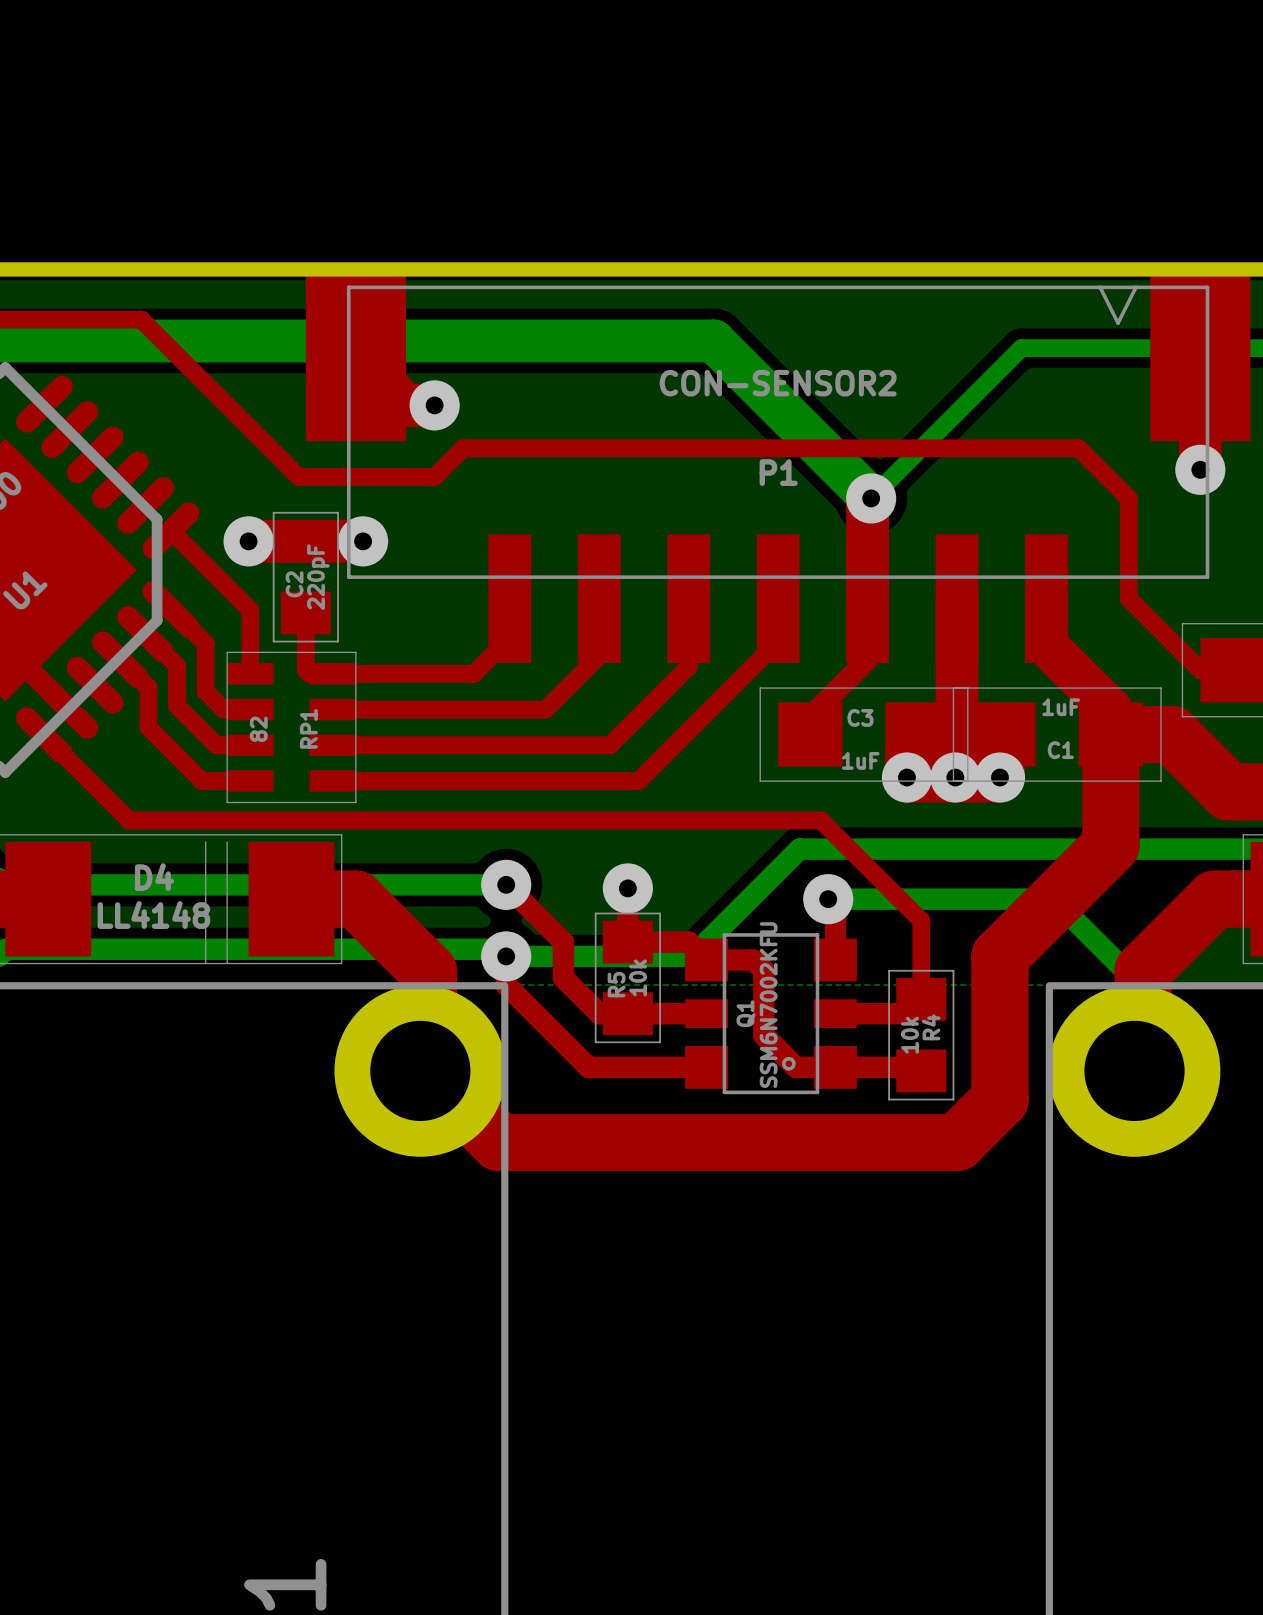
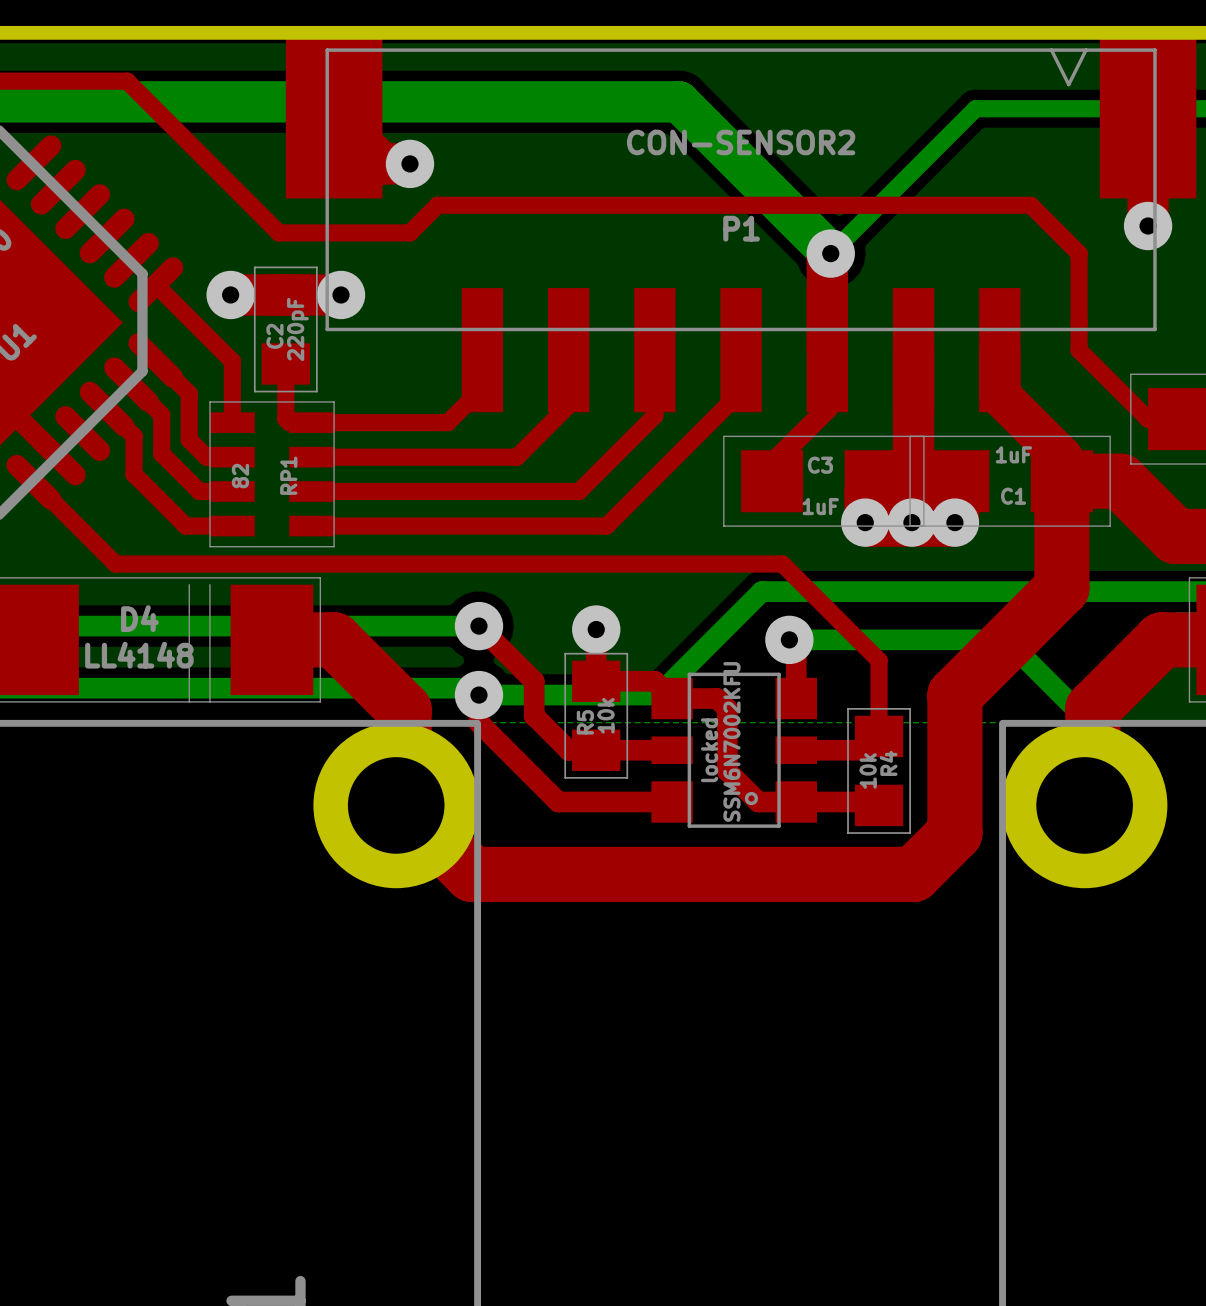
Q1 name: Q1 (746, 1013) -> locked (709, 750)

